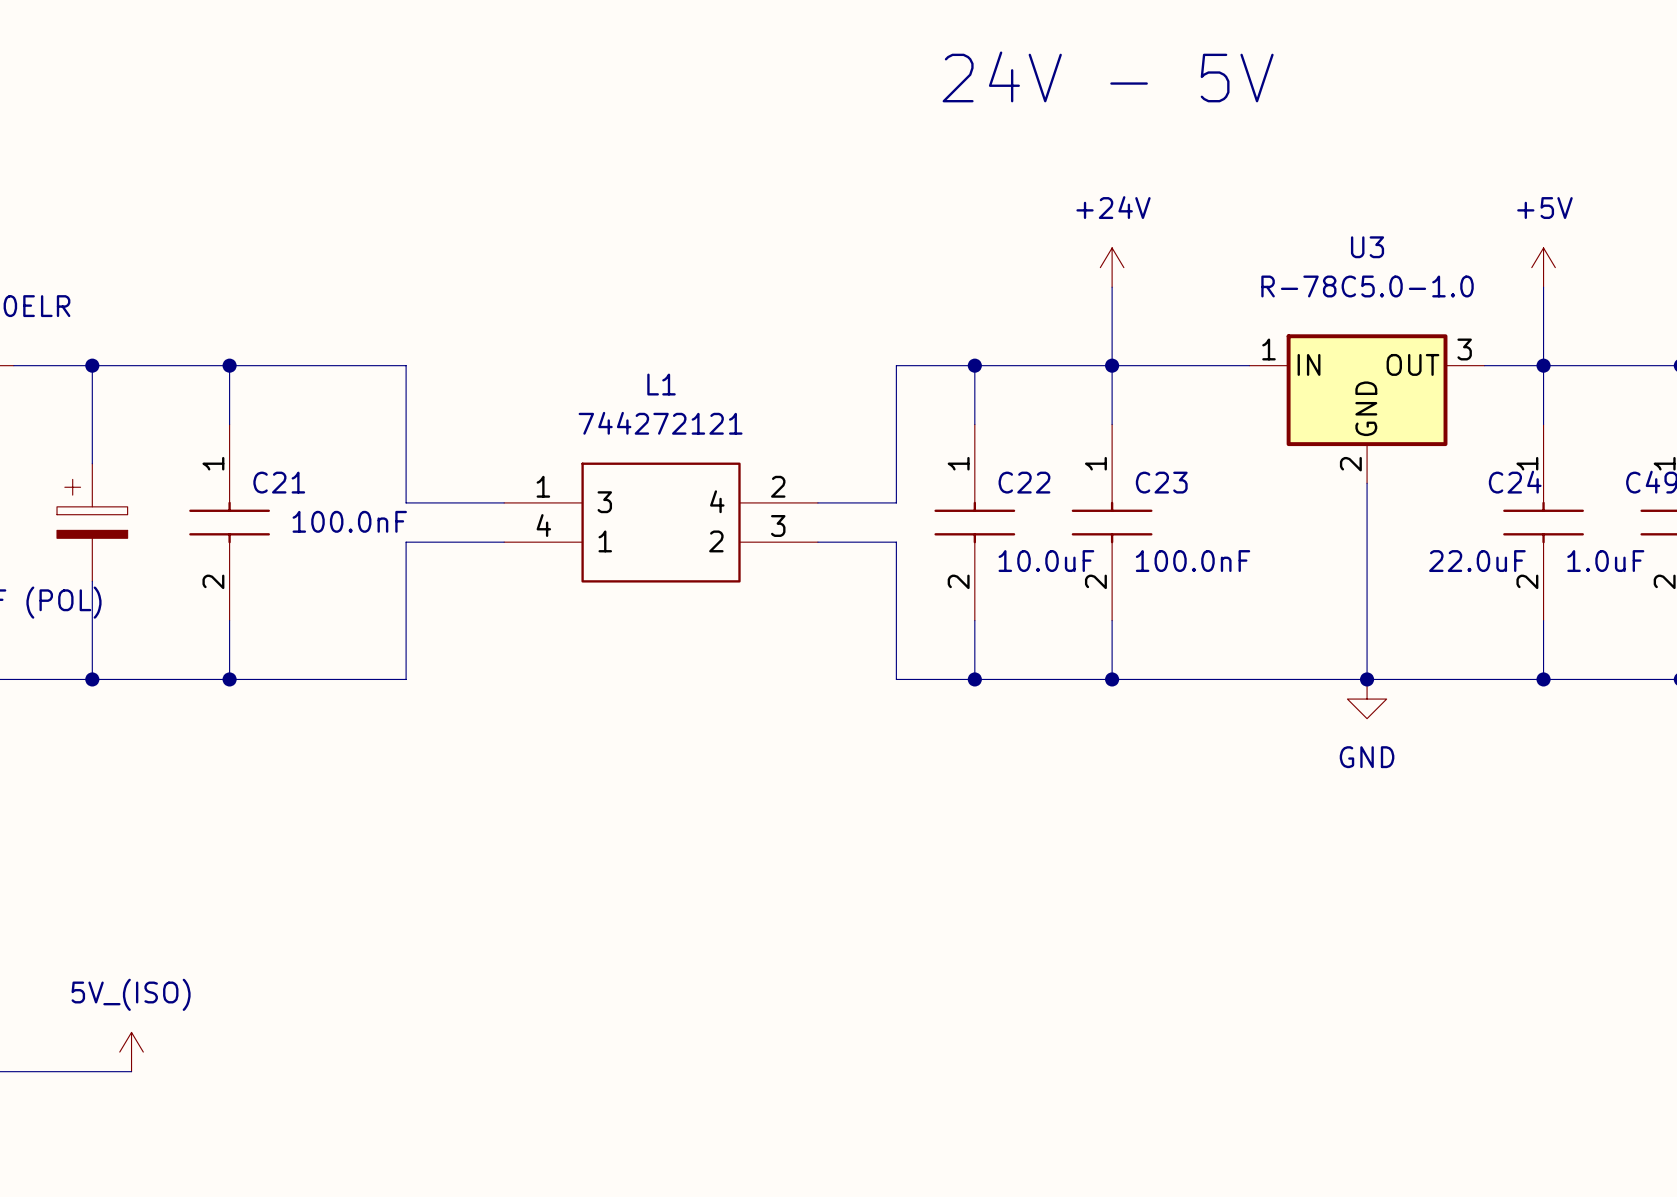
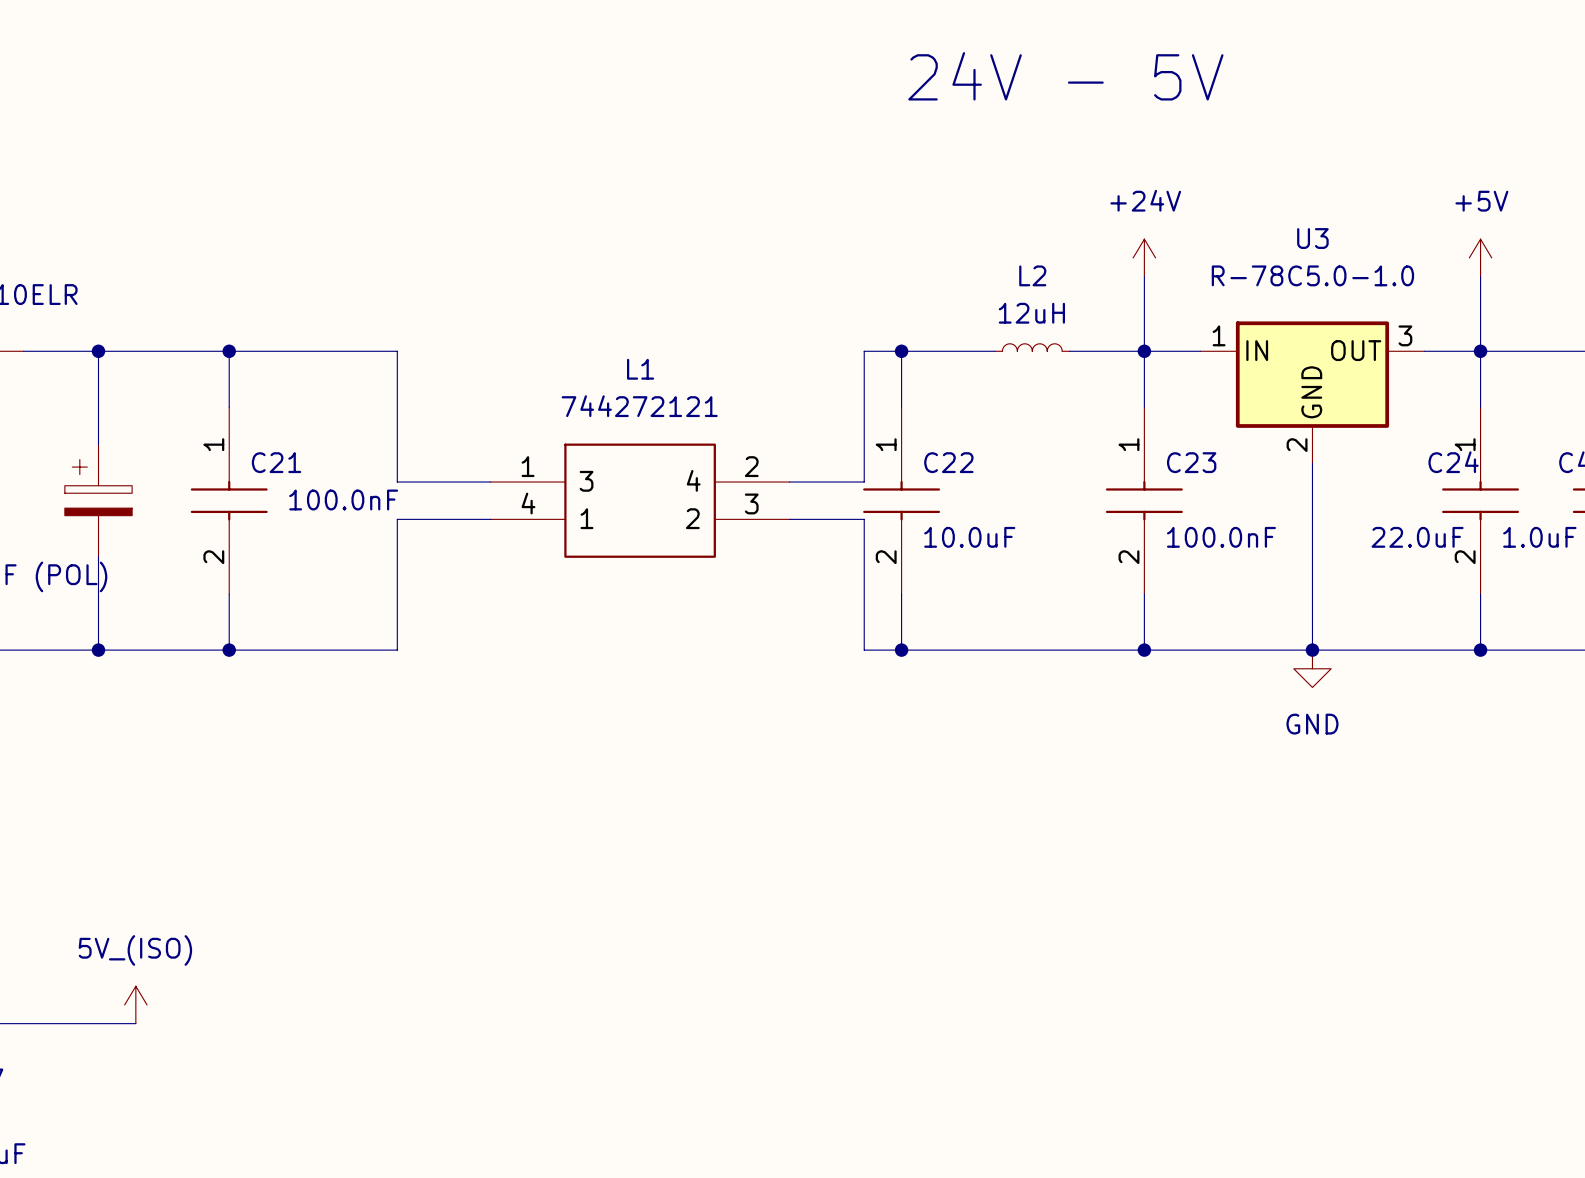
power symbol position: +24V (1112, 267) -> +24V (1144, 257)
wire: (1112, 287) (1112, 424) -> (1144, 276) (1144, 407)
L2: none -> 12uH (1032, 347)
wire: (974, 365) (974, 424) -> (901, 351) (901, 407)
junction position: (974, 365) -> (901, 351)
wire: (1033, 365) (1112, 365) -> none
junction position: (1112, 365) -> (1144, 351)
C22 position: (974, 522) -> (901, 500)
C23 position: (1112, 522) -> (1144, 500)
wire: (974, 620) (974, 679) -> (901, 594) (901, 650)
wire: (1112, 620) (1112, 679) -> (1144, 594) (1144, 650)
junction position: (974, 679) -> (901, 650)
junction position: (1112, 679) -> (1144, 650)

